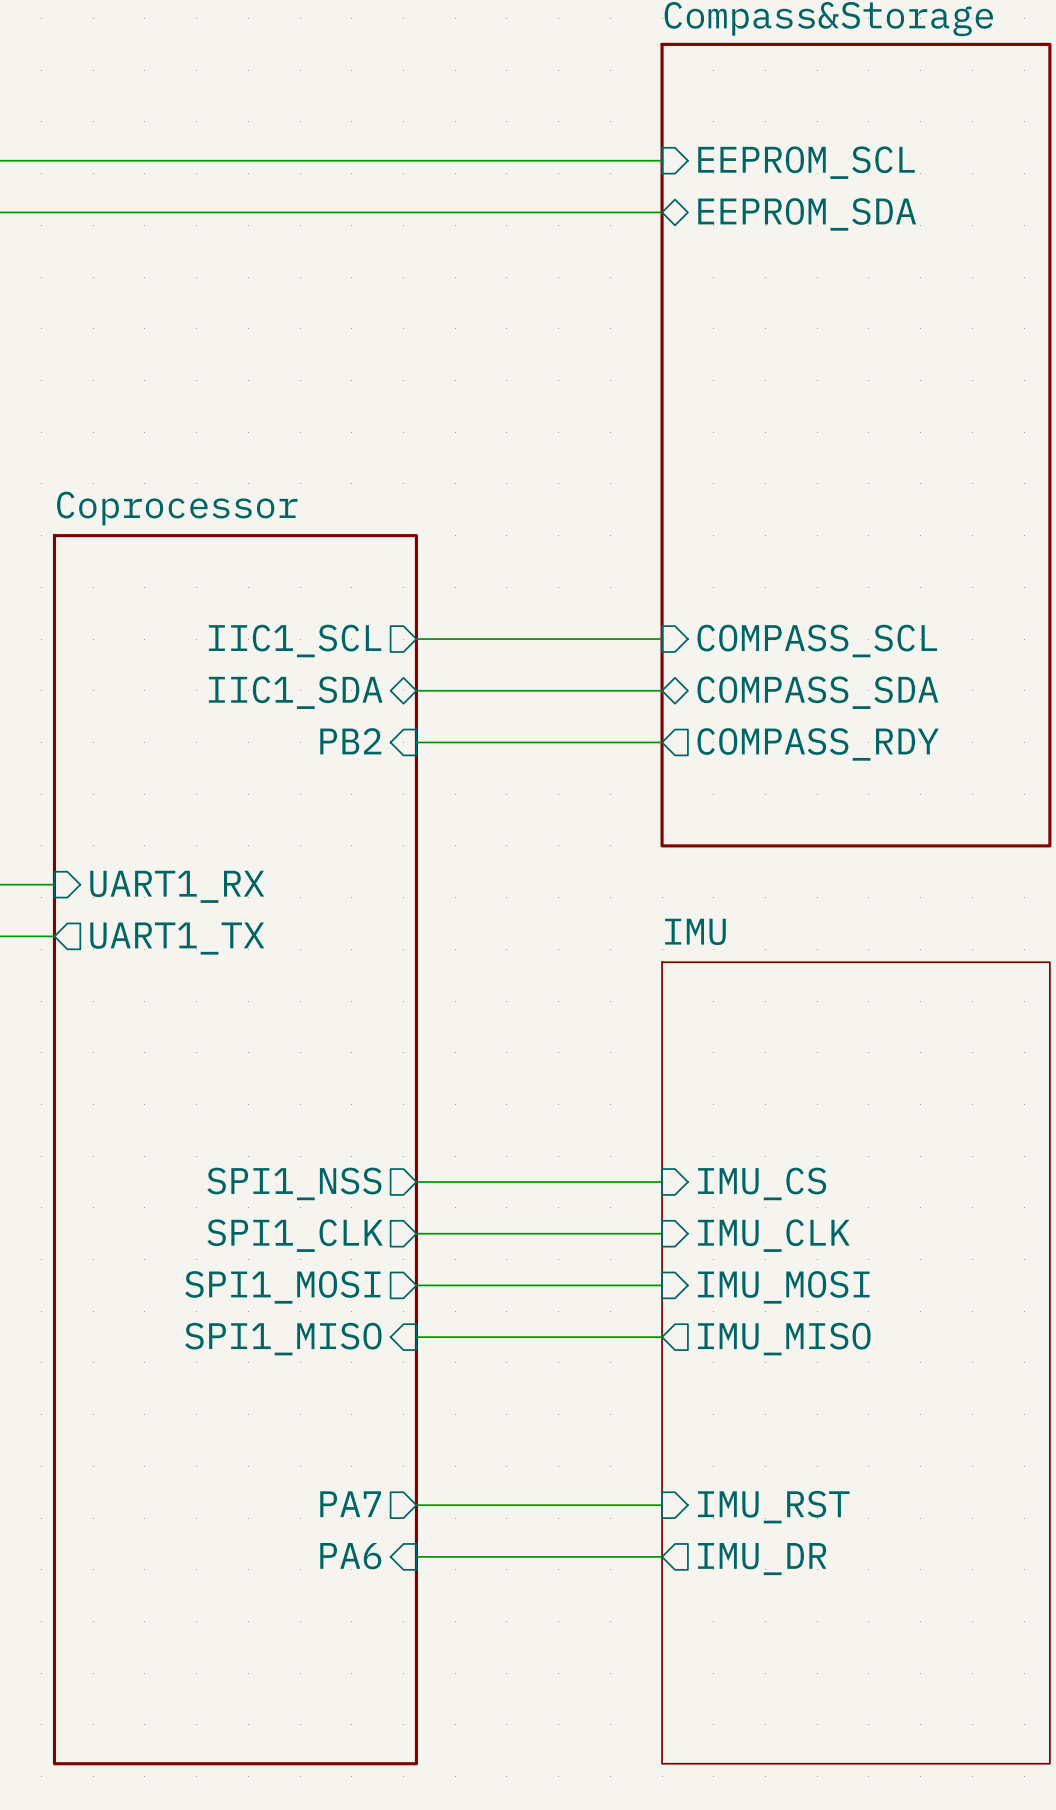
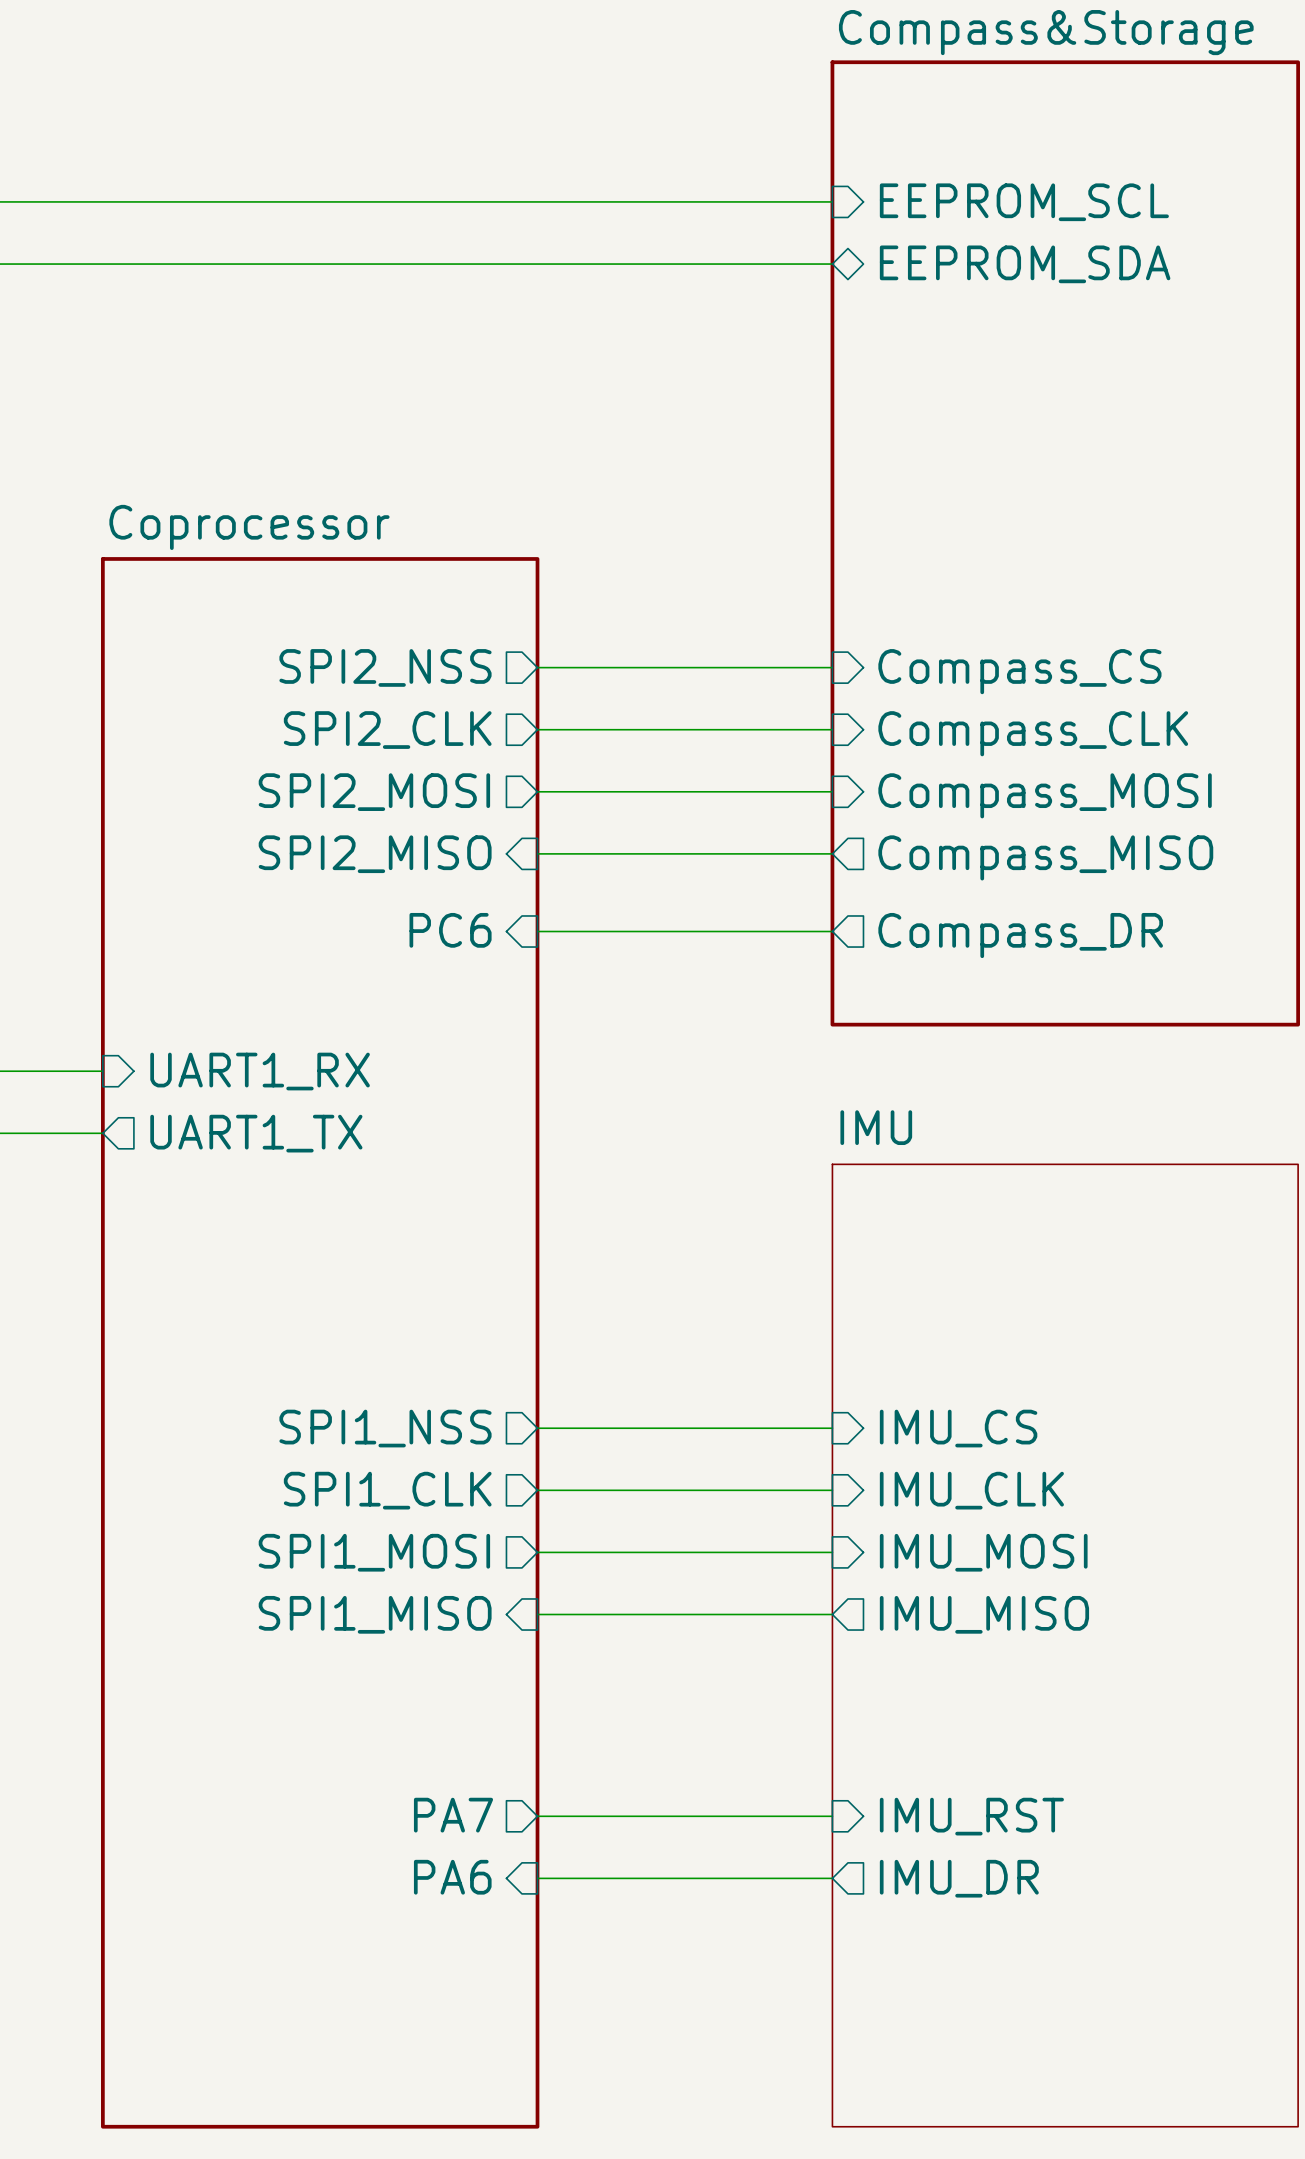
wire: none -> (537, 667) (832, 667)
sheet pin: none -> SPI2_NSS (385, 667)
sheet pin: none -> Compass_CS (1019, 671)
sheet pin: none -> SPI2_CLK (387, 730)
sheet pin: none -> Compass_CLK (1033, 733)
wire: (416, 639) (662, 639) -> (537, 729) (832, 729)
sheet pin: IIC1_SCL (295, 640) -> SPI2_MOSI (374, 792)
sheet pin: COMPASS_SCL (817, 640) -> Compass_MOSI (1045, 795)
wire: (416, 690) (662, 690) -> (537, 791) (832, 791)
sheet pin shape: bidirectional (295, 692) -> input (375, 854)
sheet pin: IIC1_SDA (295, 692) -> SPI2_MISO (375, 854)
sheet pin shape: bidirectional (817, 692) -> output (1045, 857)
sheet pin: COMPASS_SDA (817, 692) -> Compass_MISO (1045, 857)
sheet pin: PB2 (350, 741) -> none
wire: (416, 742) (662, 742) -> (537, 853) (832, 853)
sheet pin: COMPASS_RDY (818, 744) -> none
sheet pin: none -> PC6 (450, 930)
wire: none -> (537, 931) (832, 931)
sheet pin: none -> Compass_DR (1020, 935)
sheet Coprocessor: none -> (320, 1342)
sheet Coprocessor: (235, 1149) -> none

